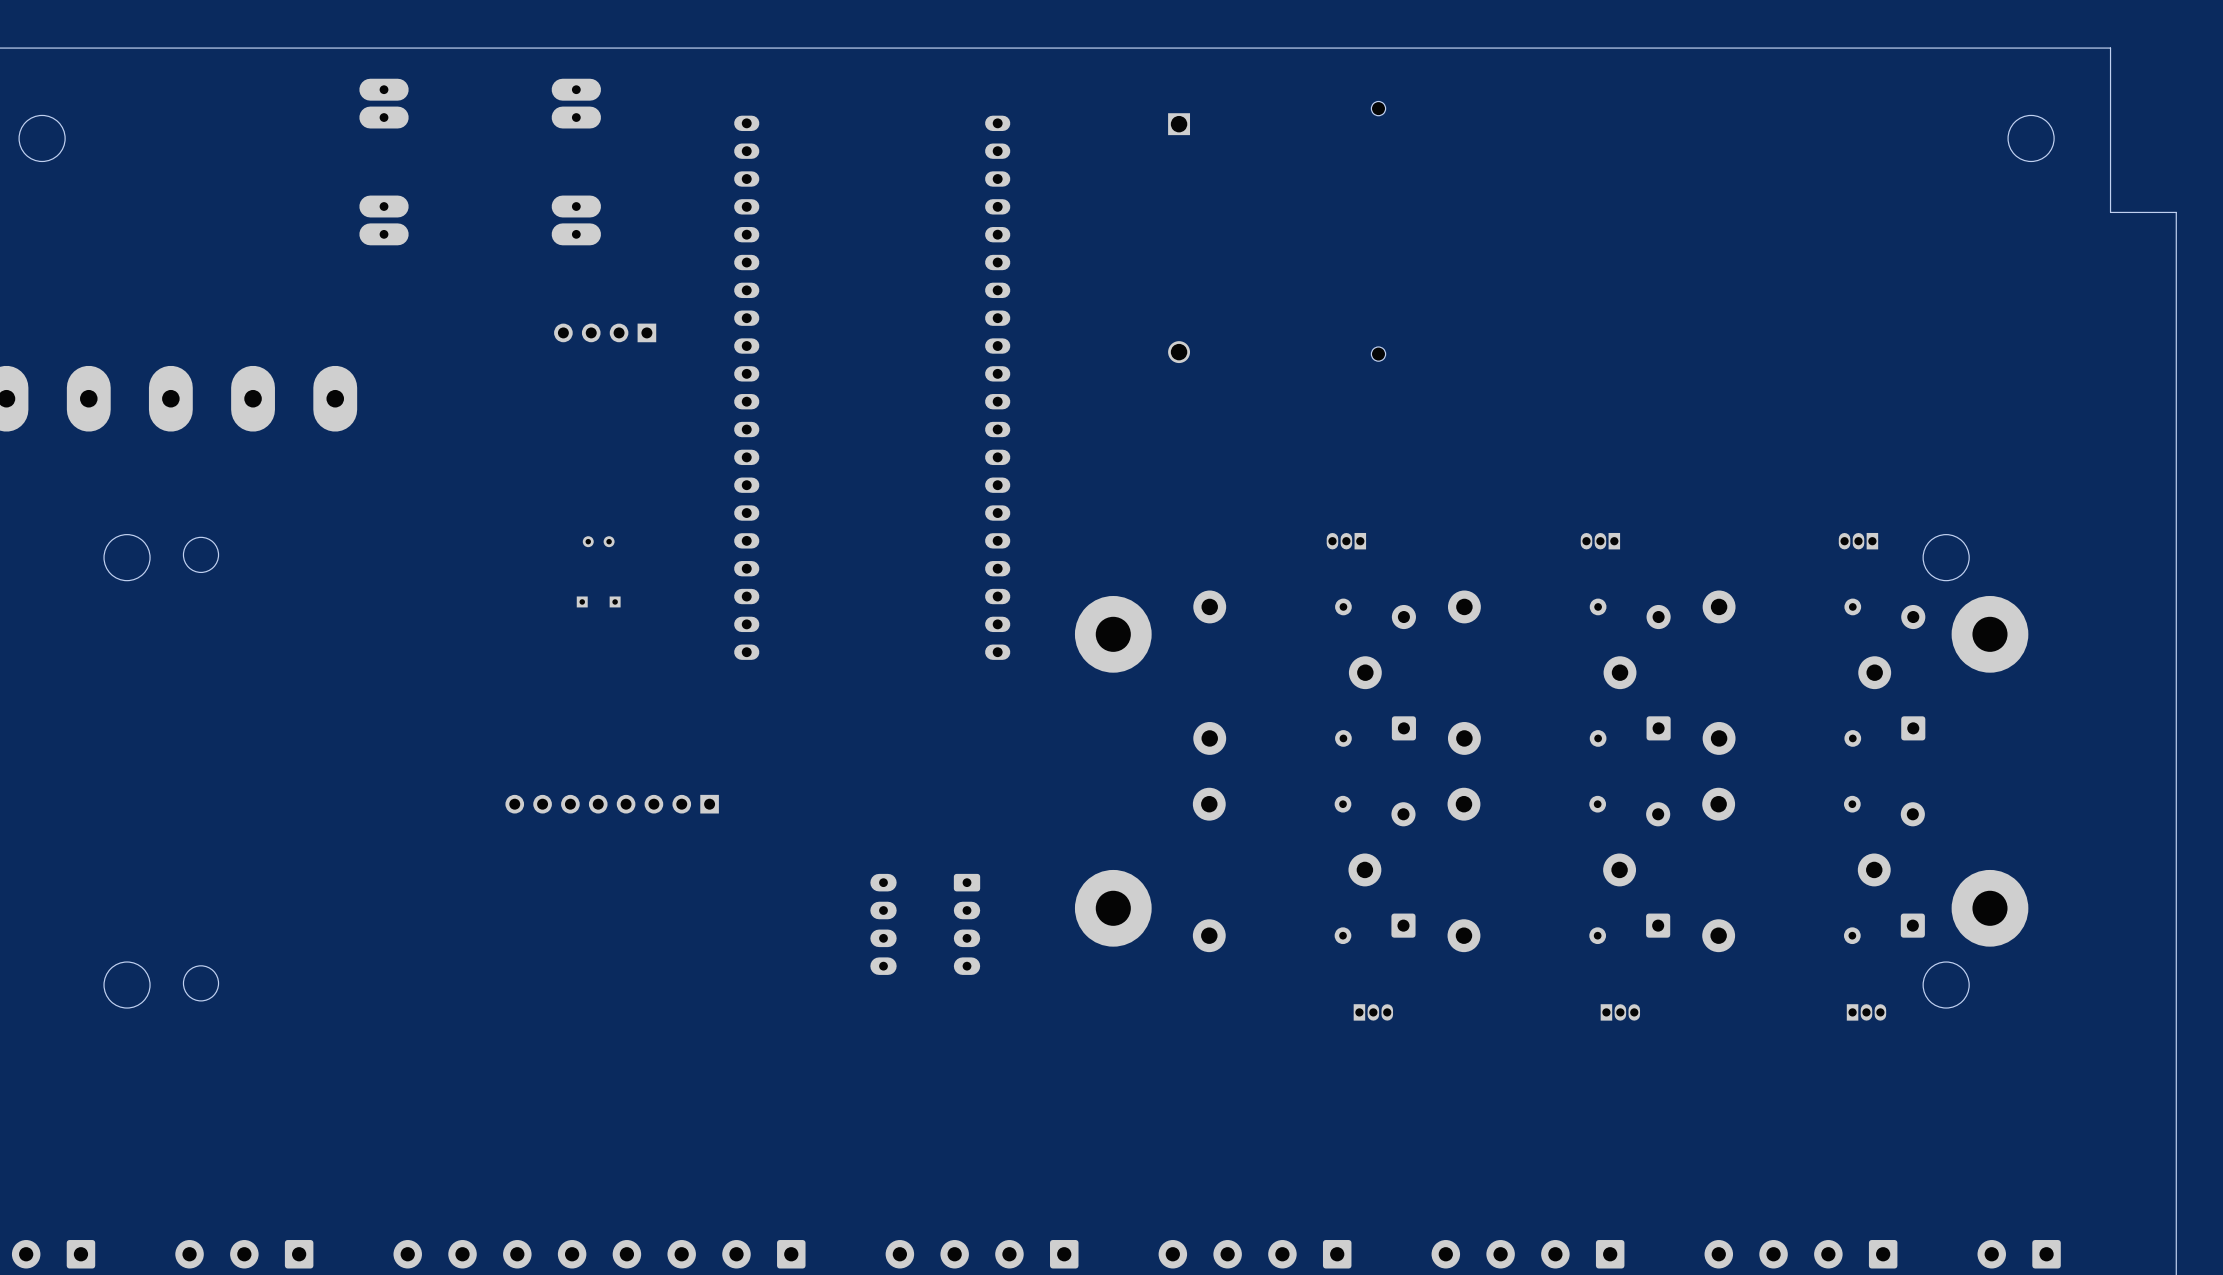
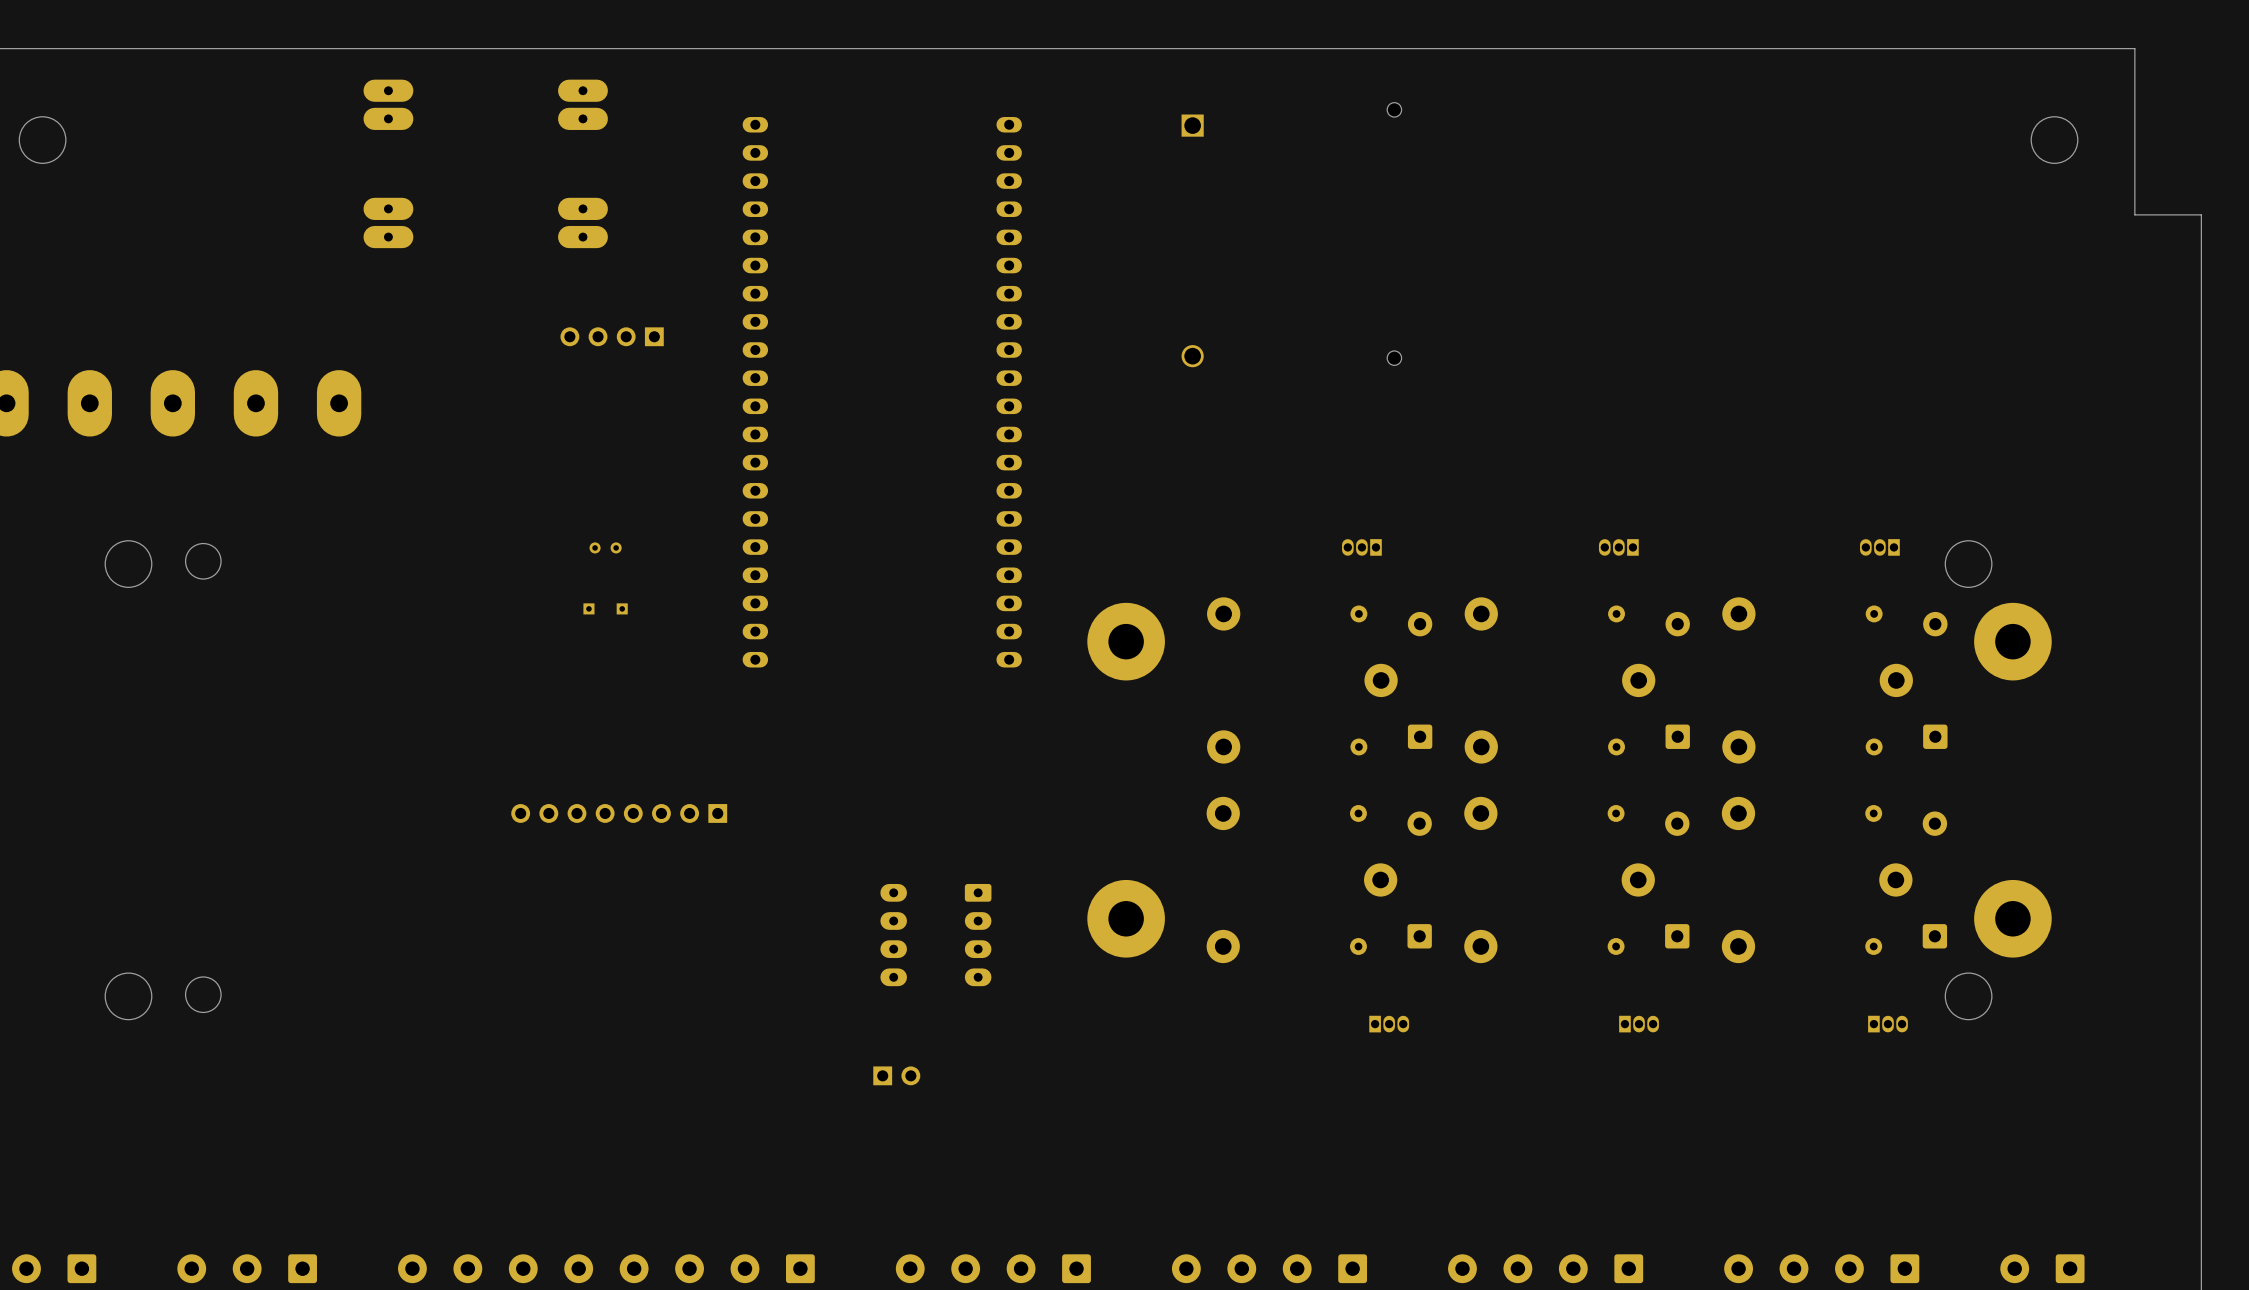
part: none -> (896, 1075)

